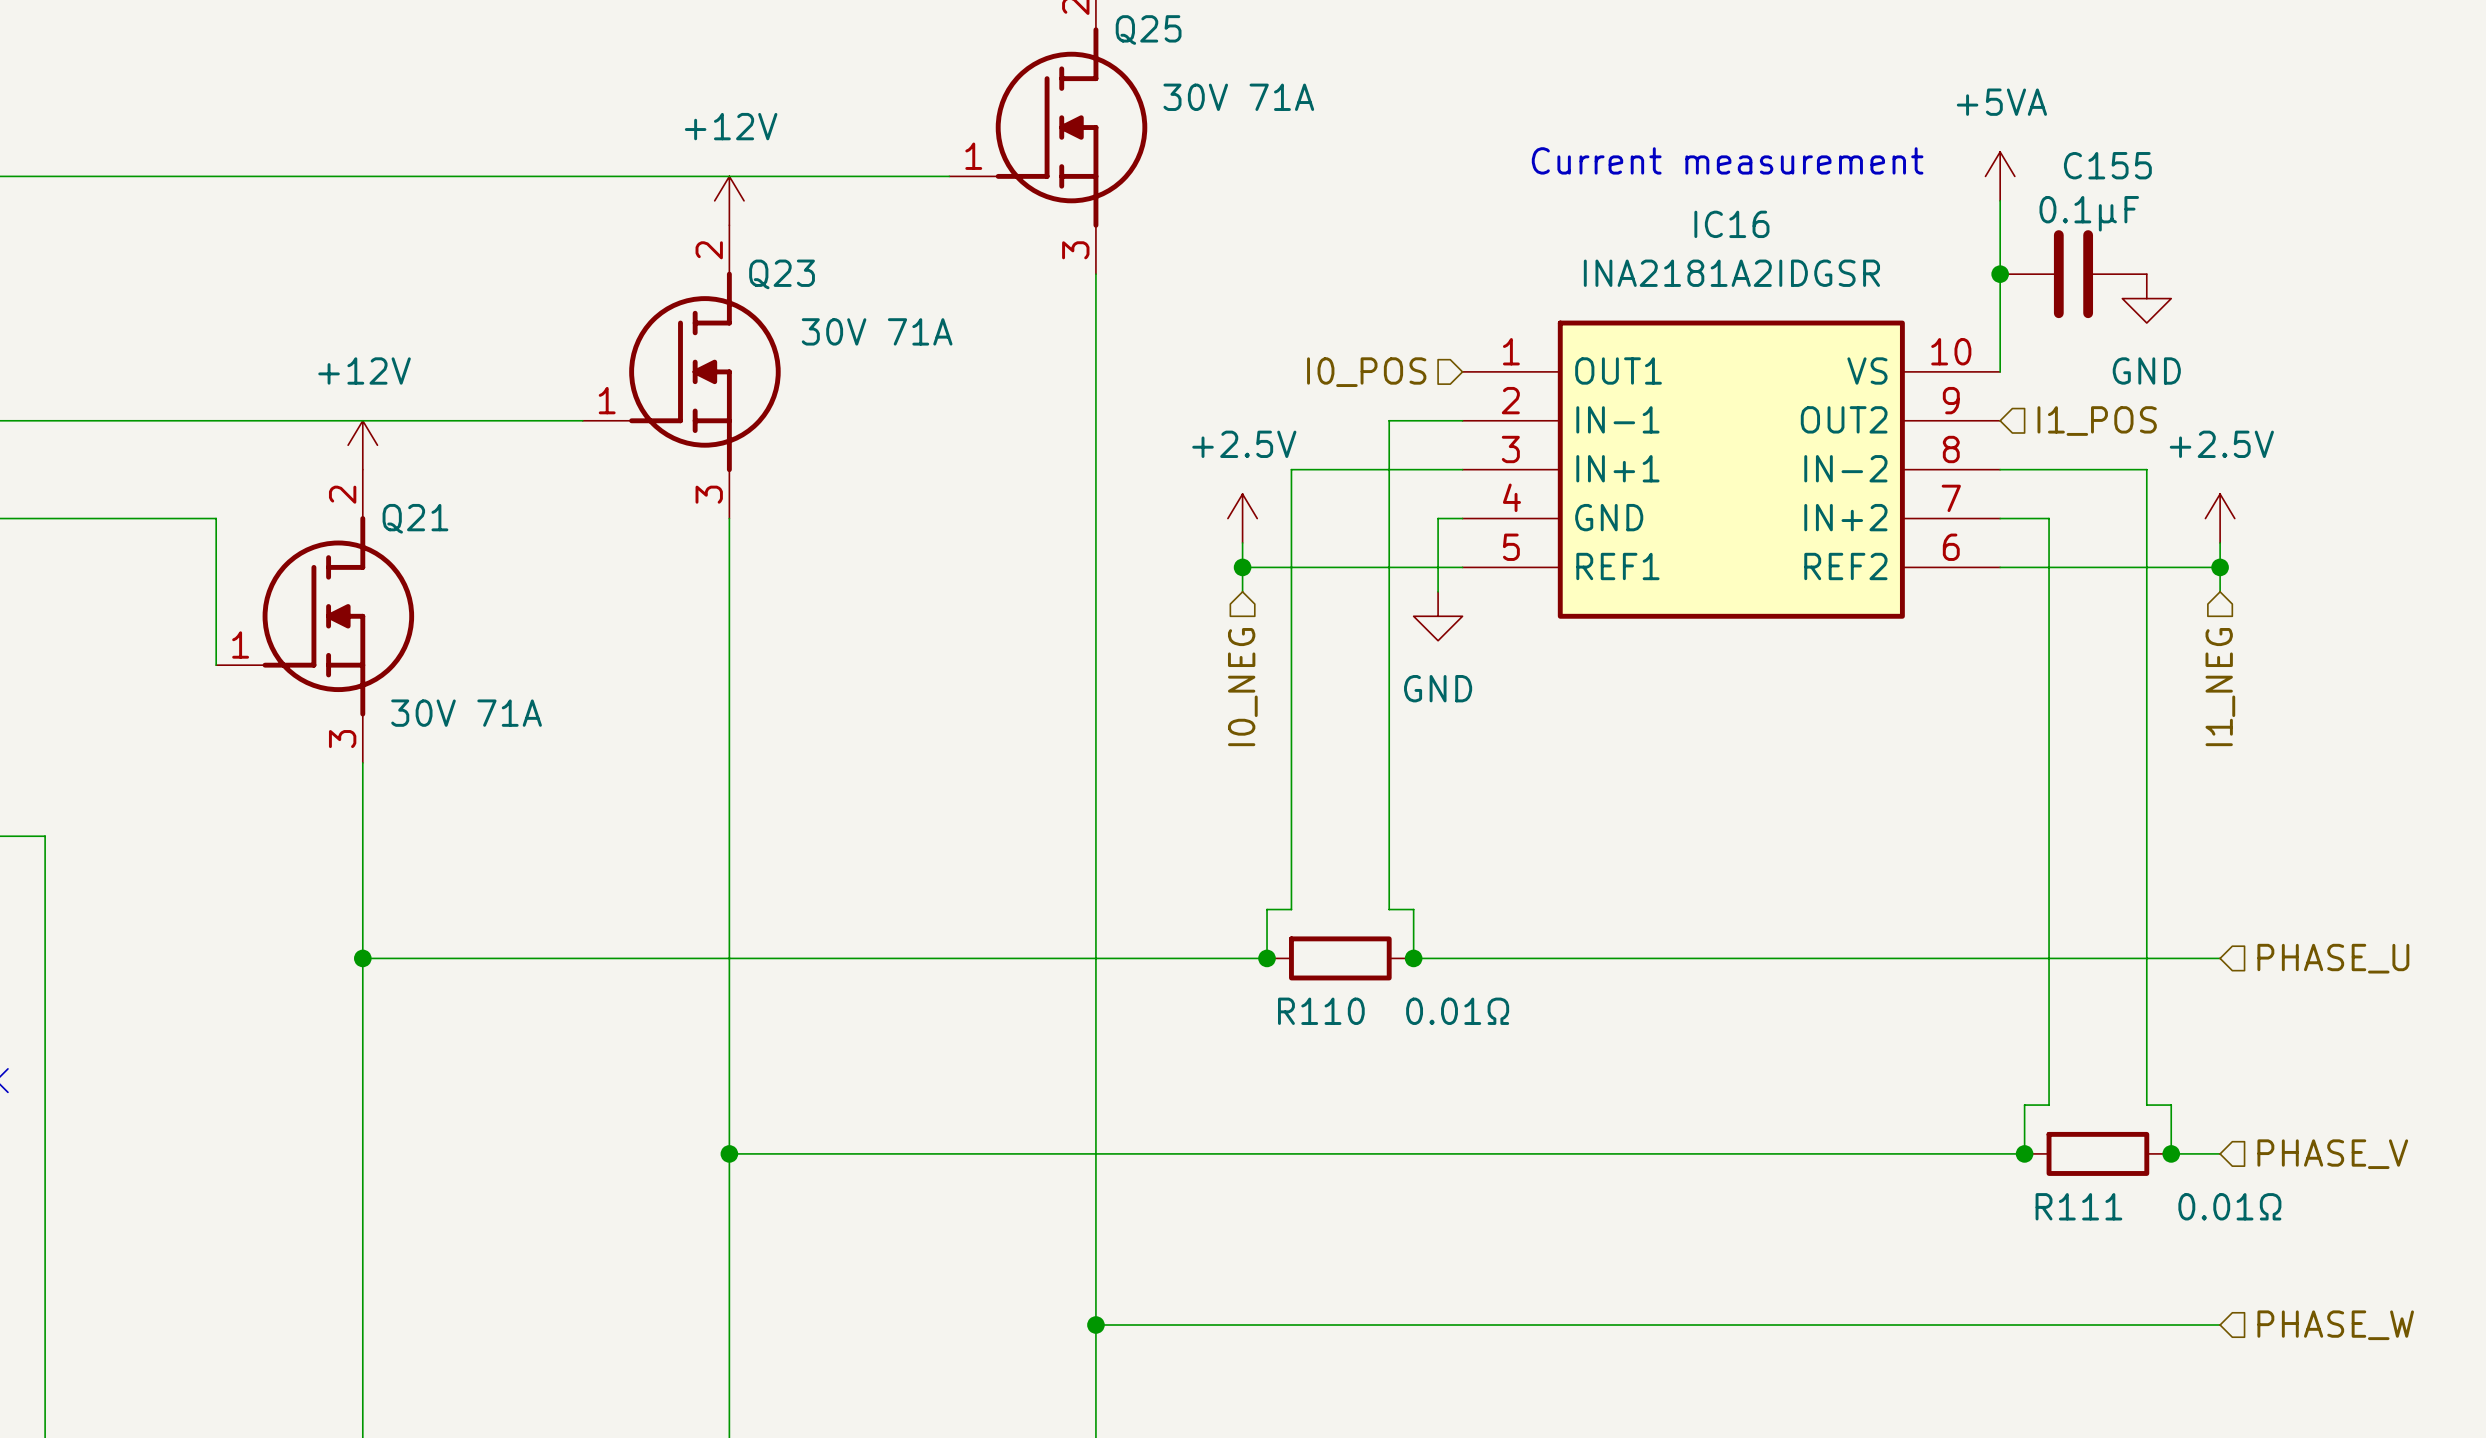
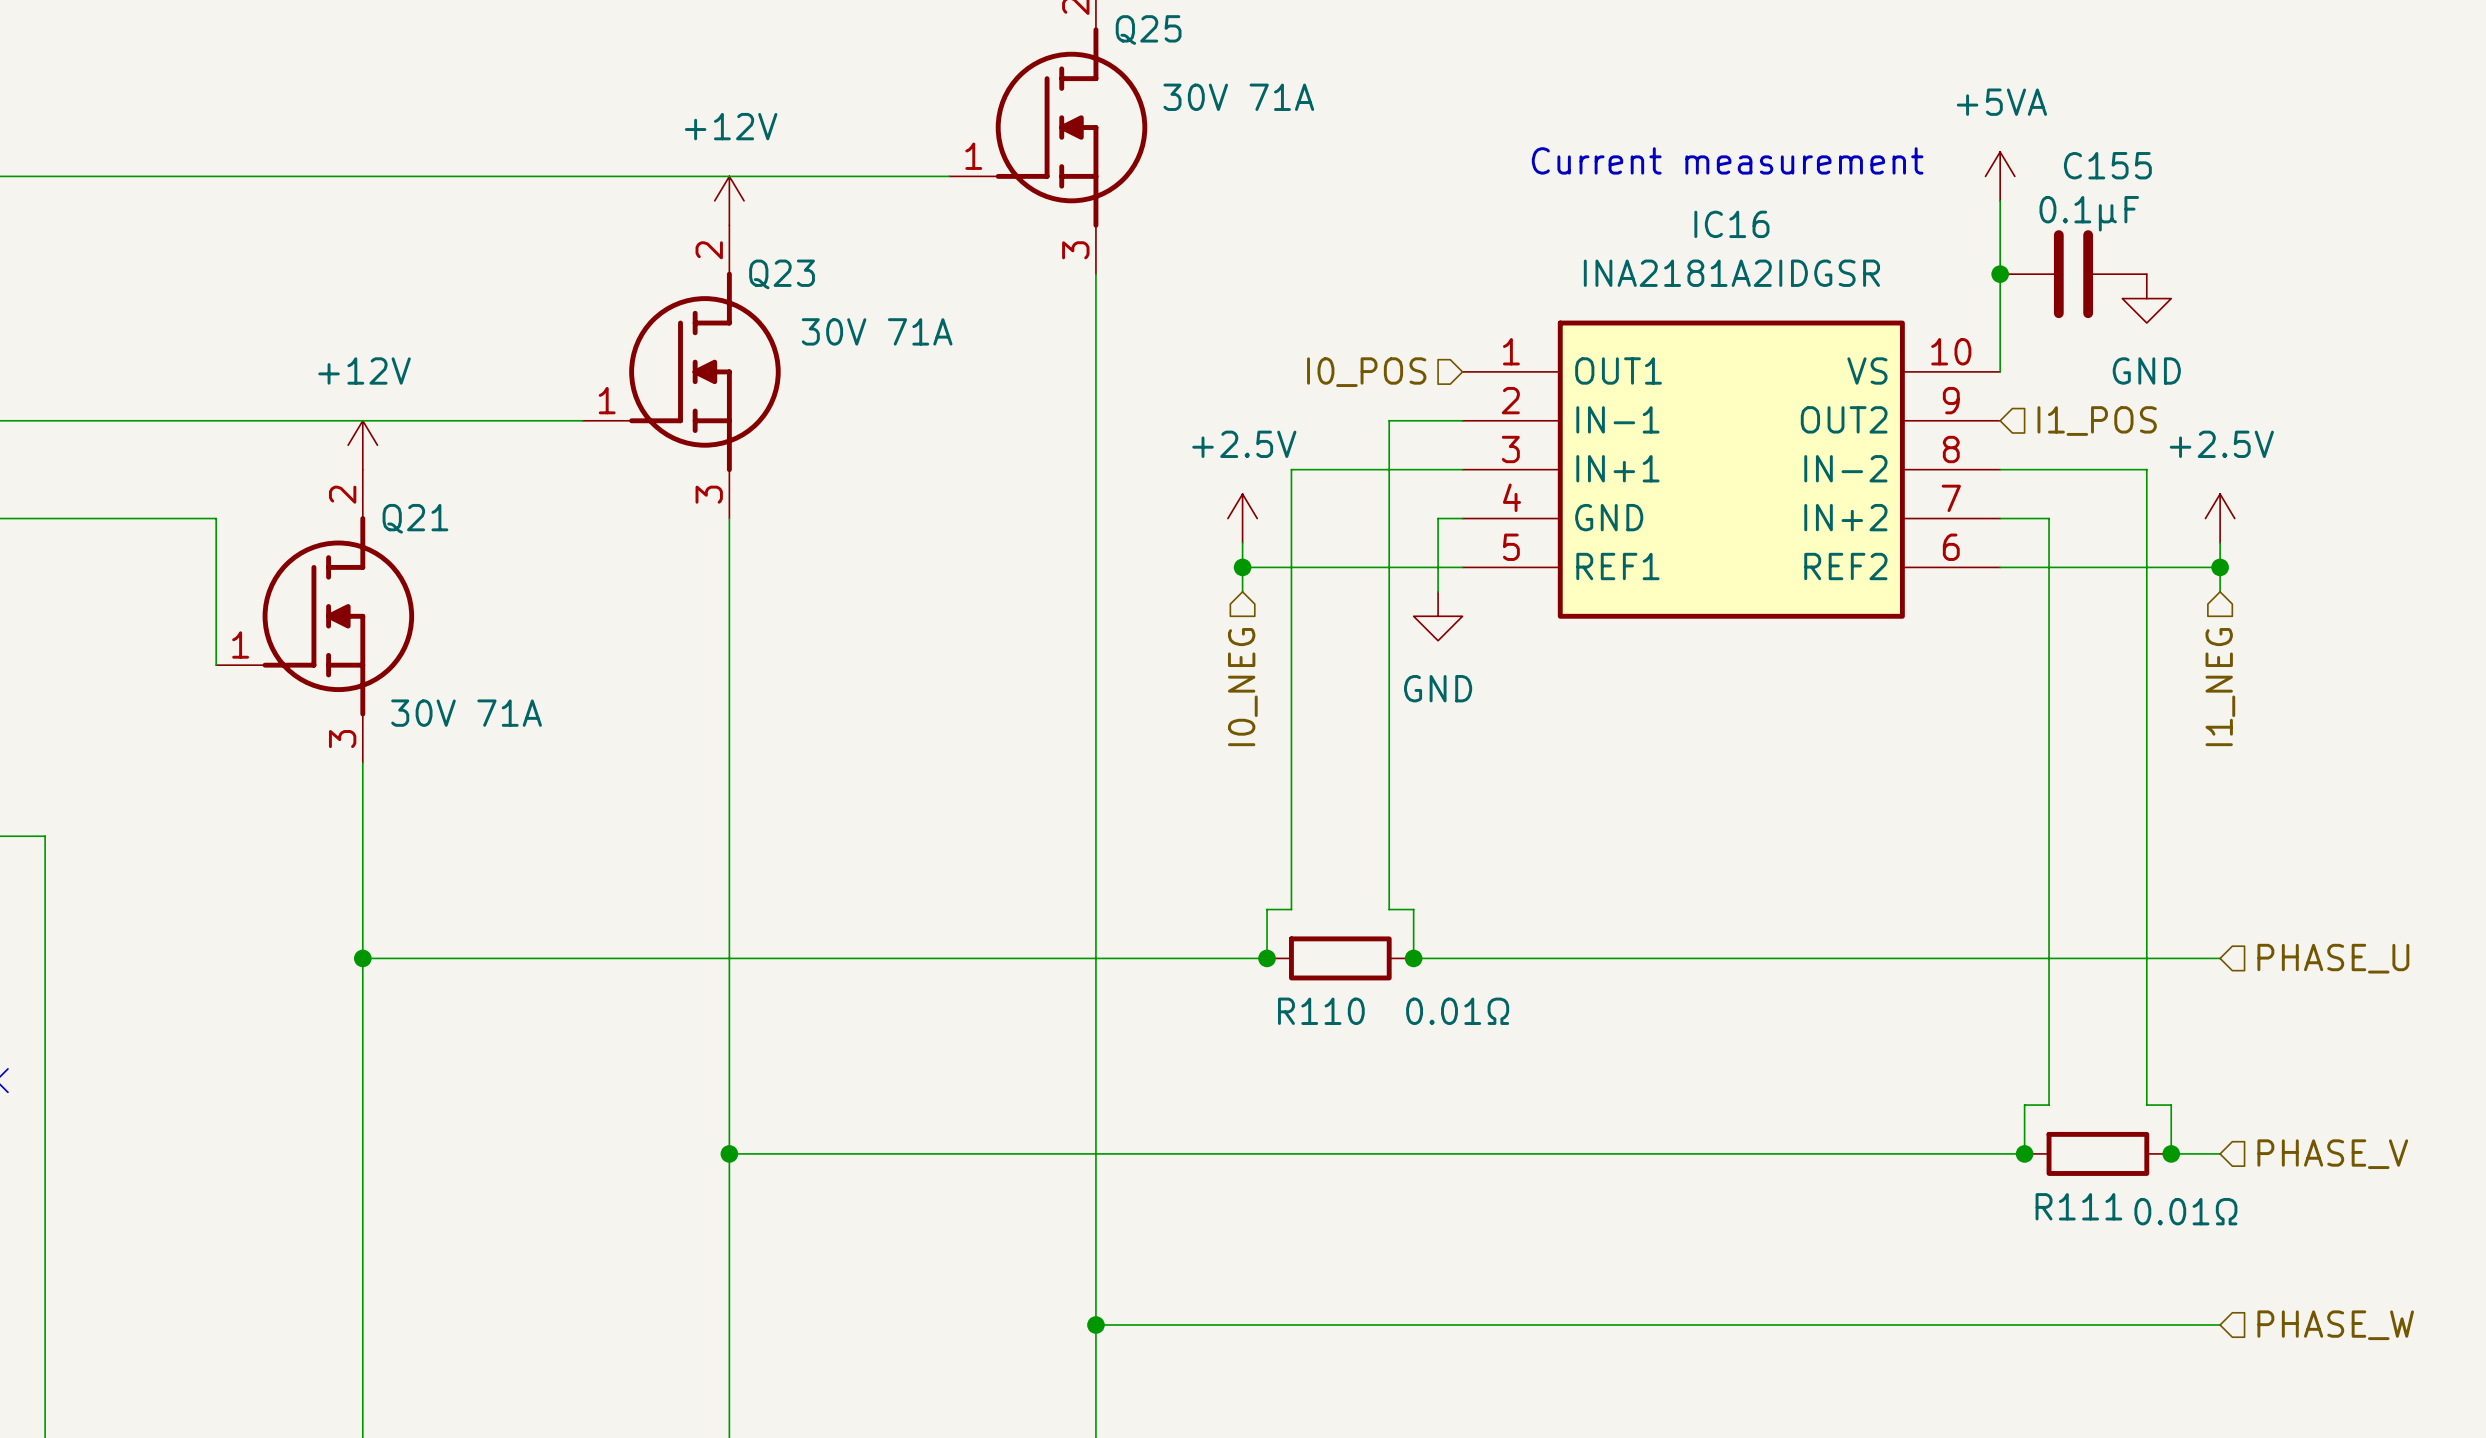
R111 value position: 0.01Ω (2229, 1206) -> 0.01Ω (2185, 1211)

